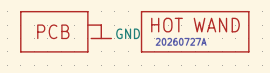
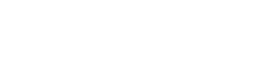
part: (60, 31) -> none
part: (195, 31) -> none
power symbol: GND (101, 32) -> none

